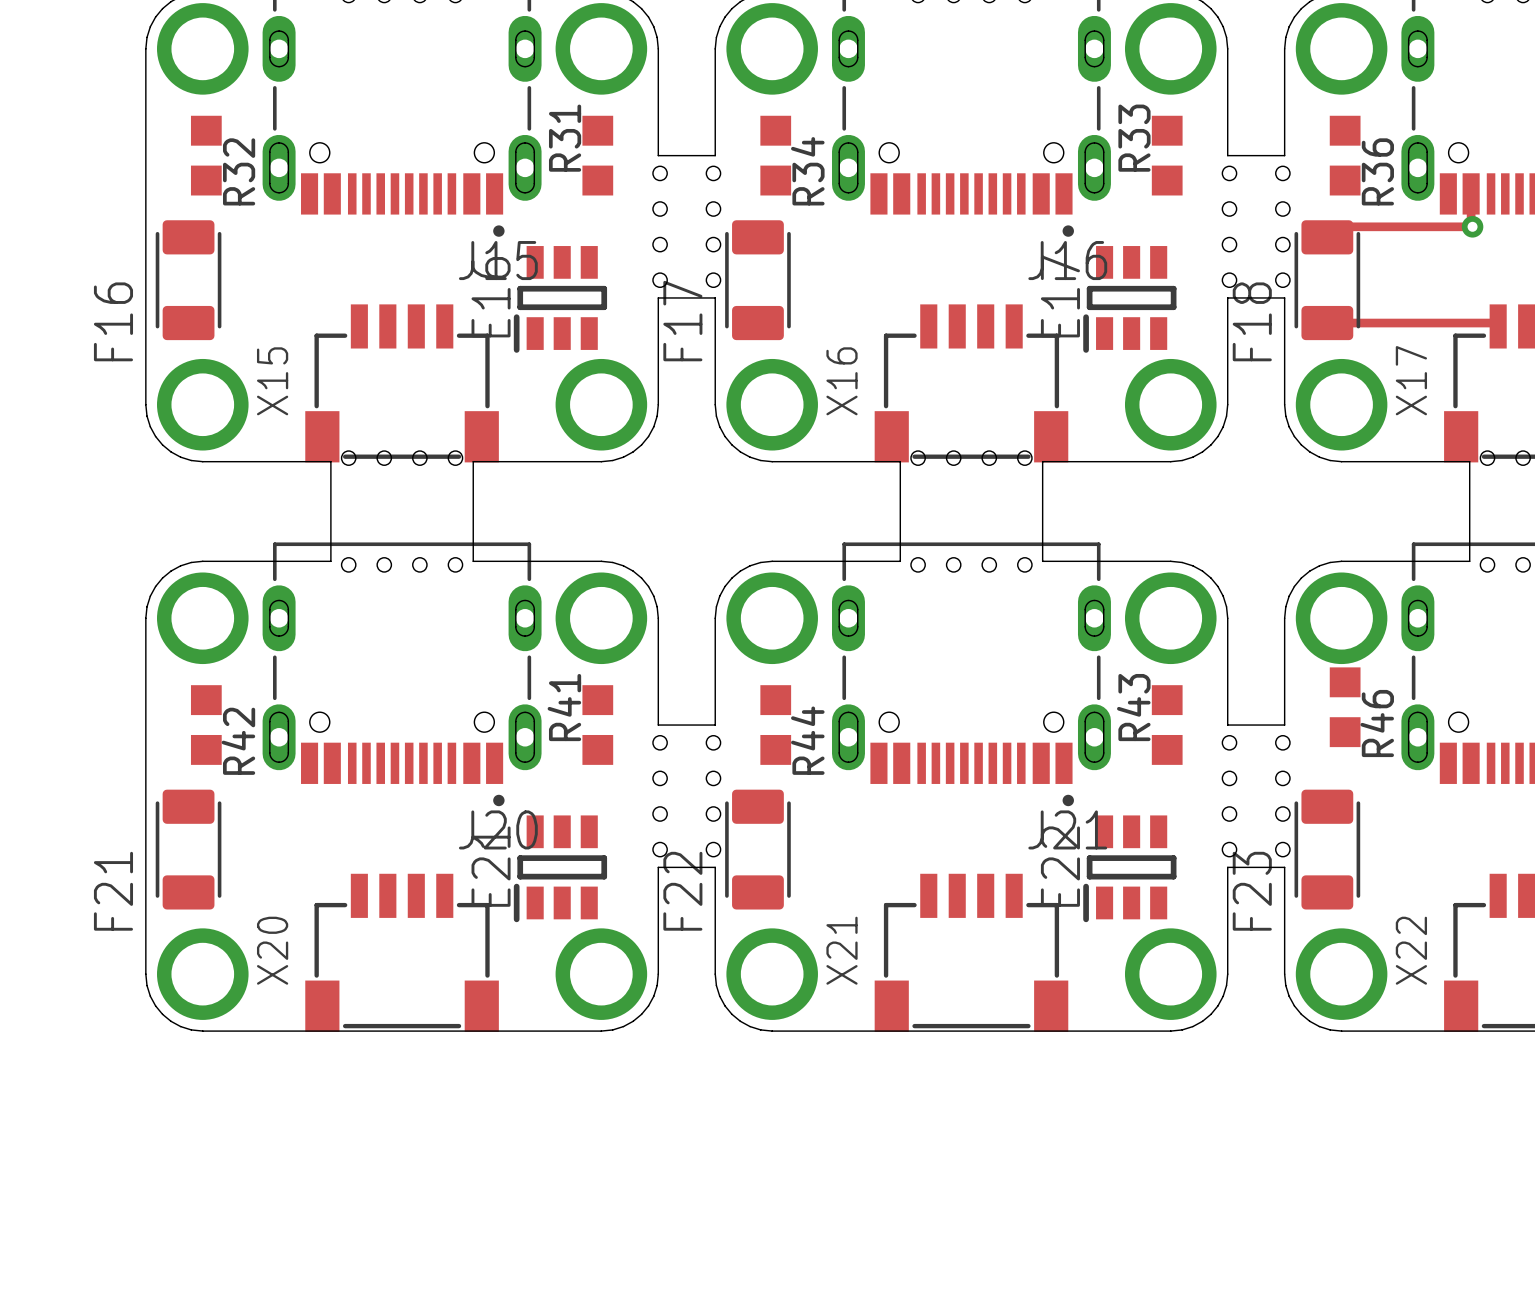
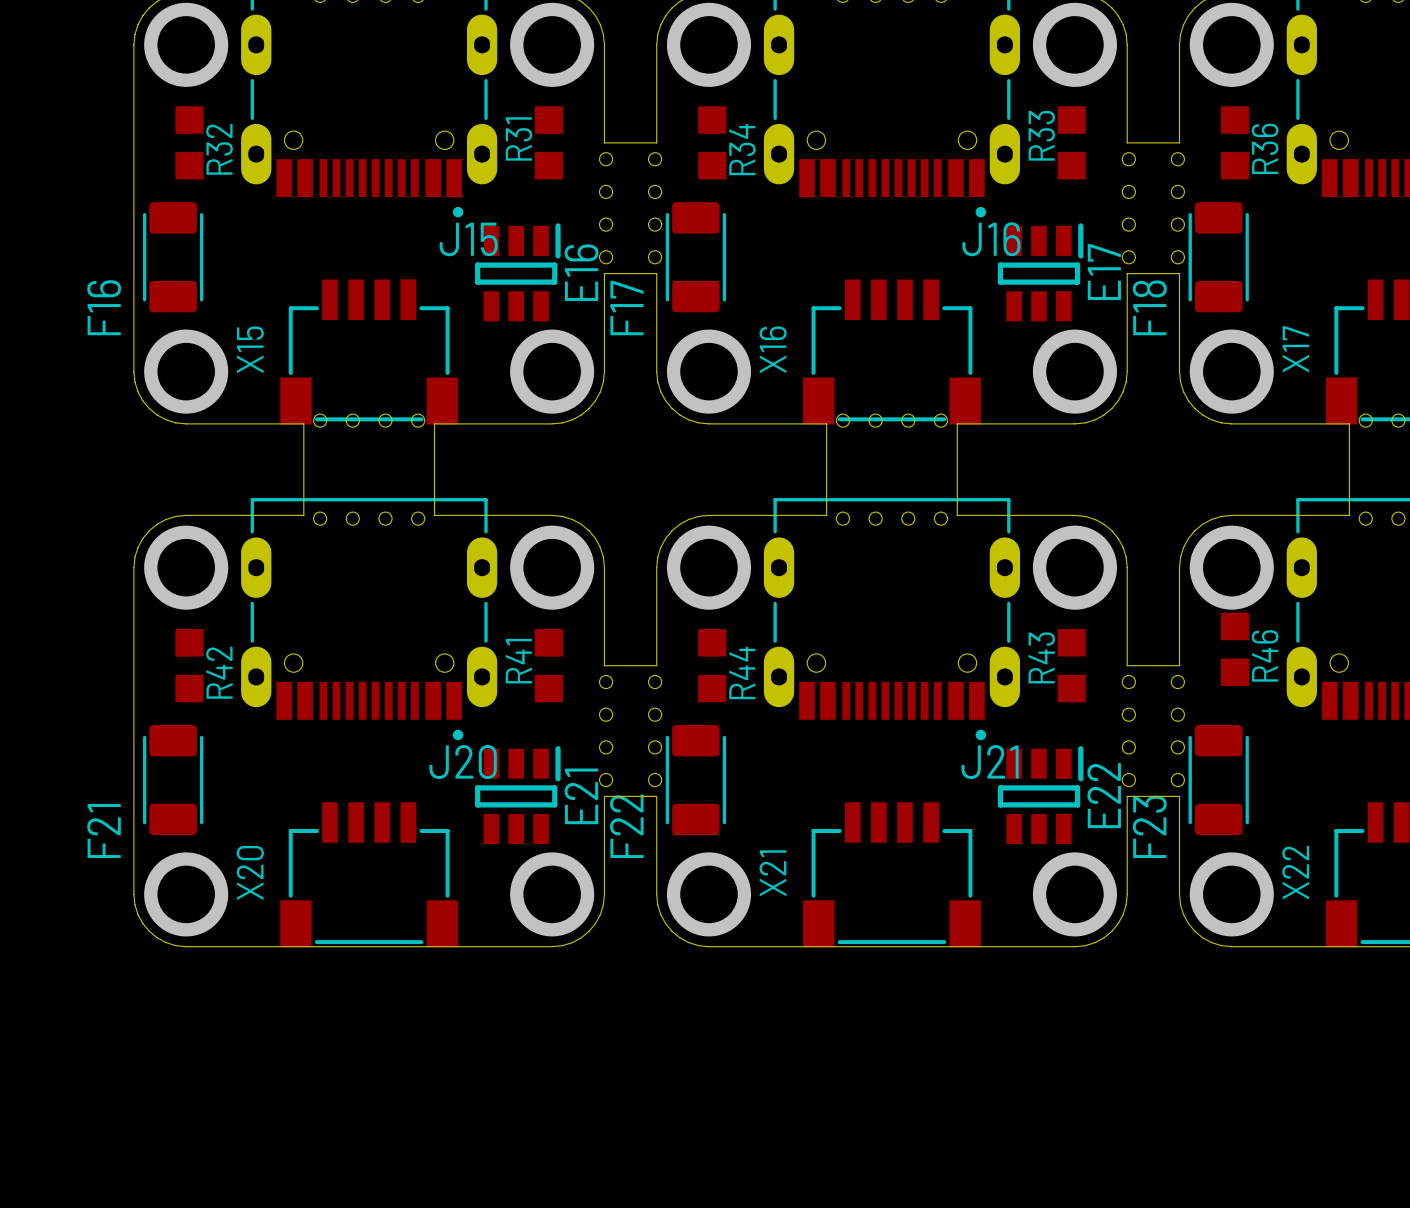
track: (1471, 193) (1472, 226) (1337, 226) (1327, 237) -> none
via: (1472, 226) -> none
E16 rotation: 0° (560, 299) -> 180° (517, 272)
E17 rotation: 0° (1129, 299) -> 180° (1040, 272)
track: (1327, 323) (1494, 323) (1498, 326) -> none
E21 rotation: 0° (560, 868) -> 180° (517, 795)
E22 rotation: 0° (1129, 868) -> 180° (1040, 795)

